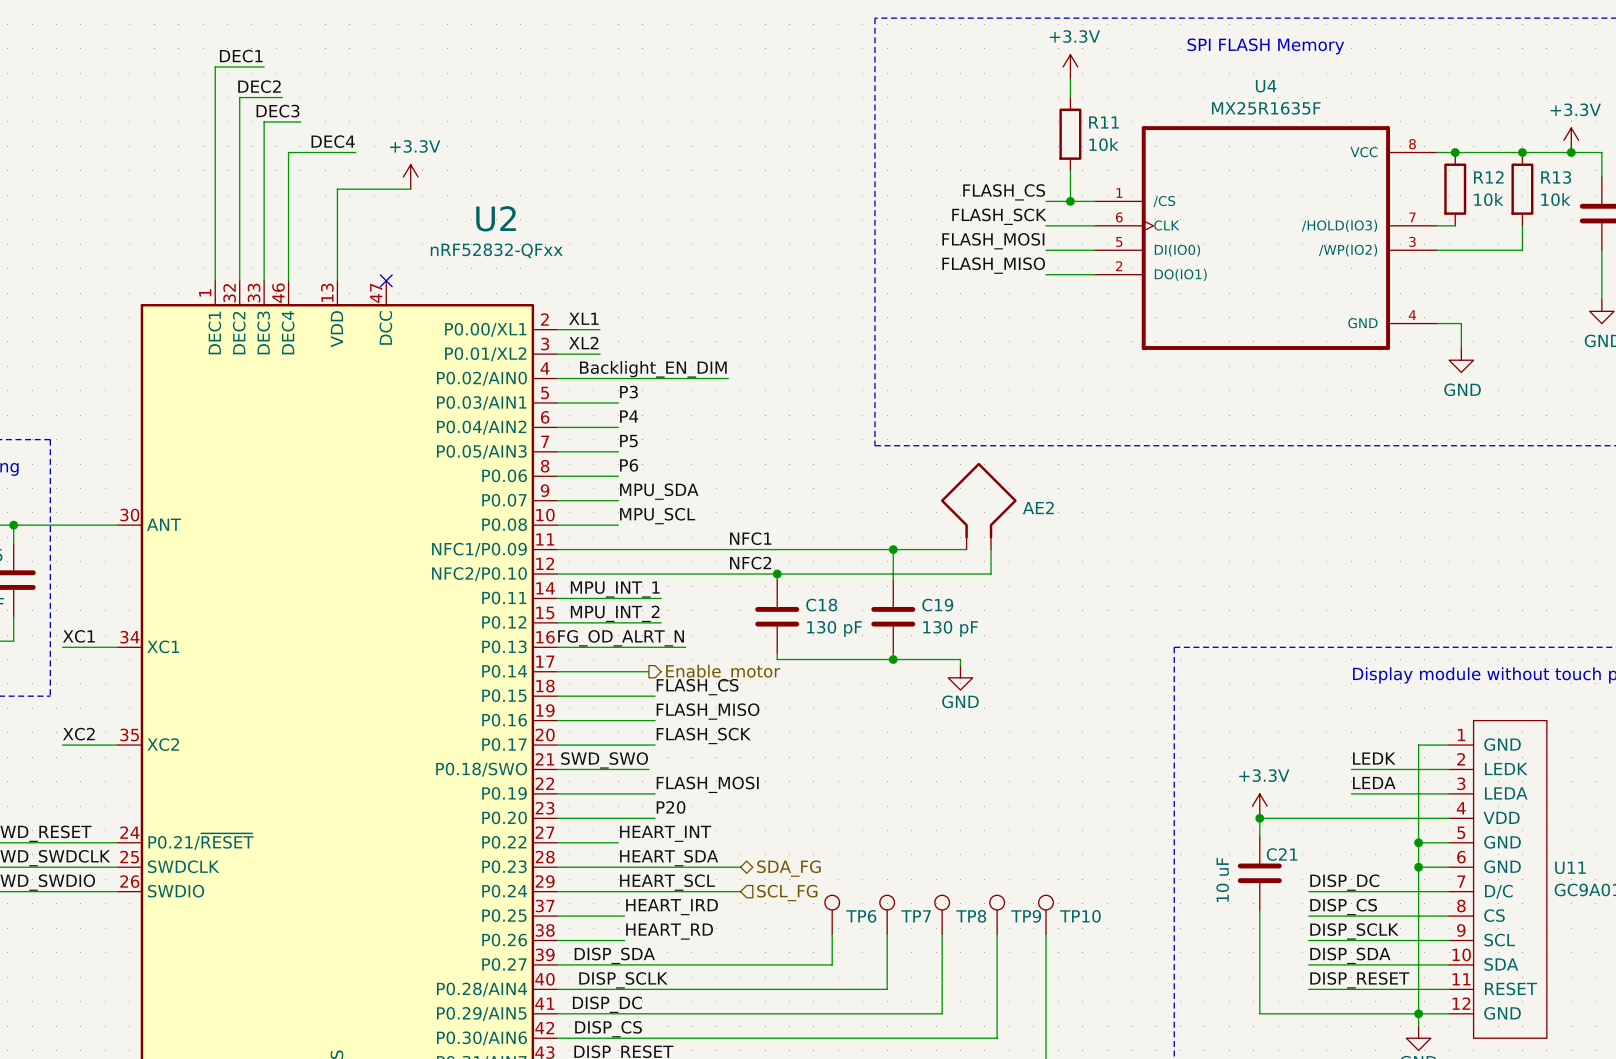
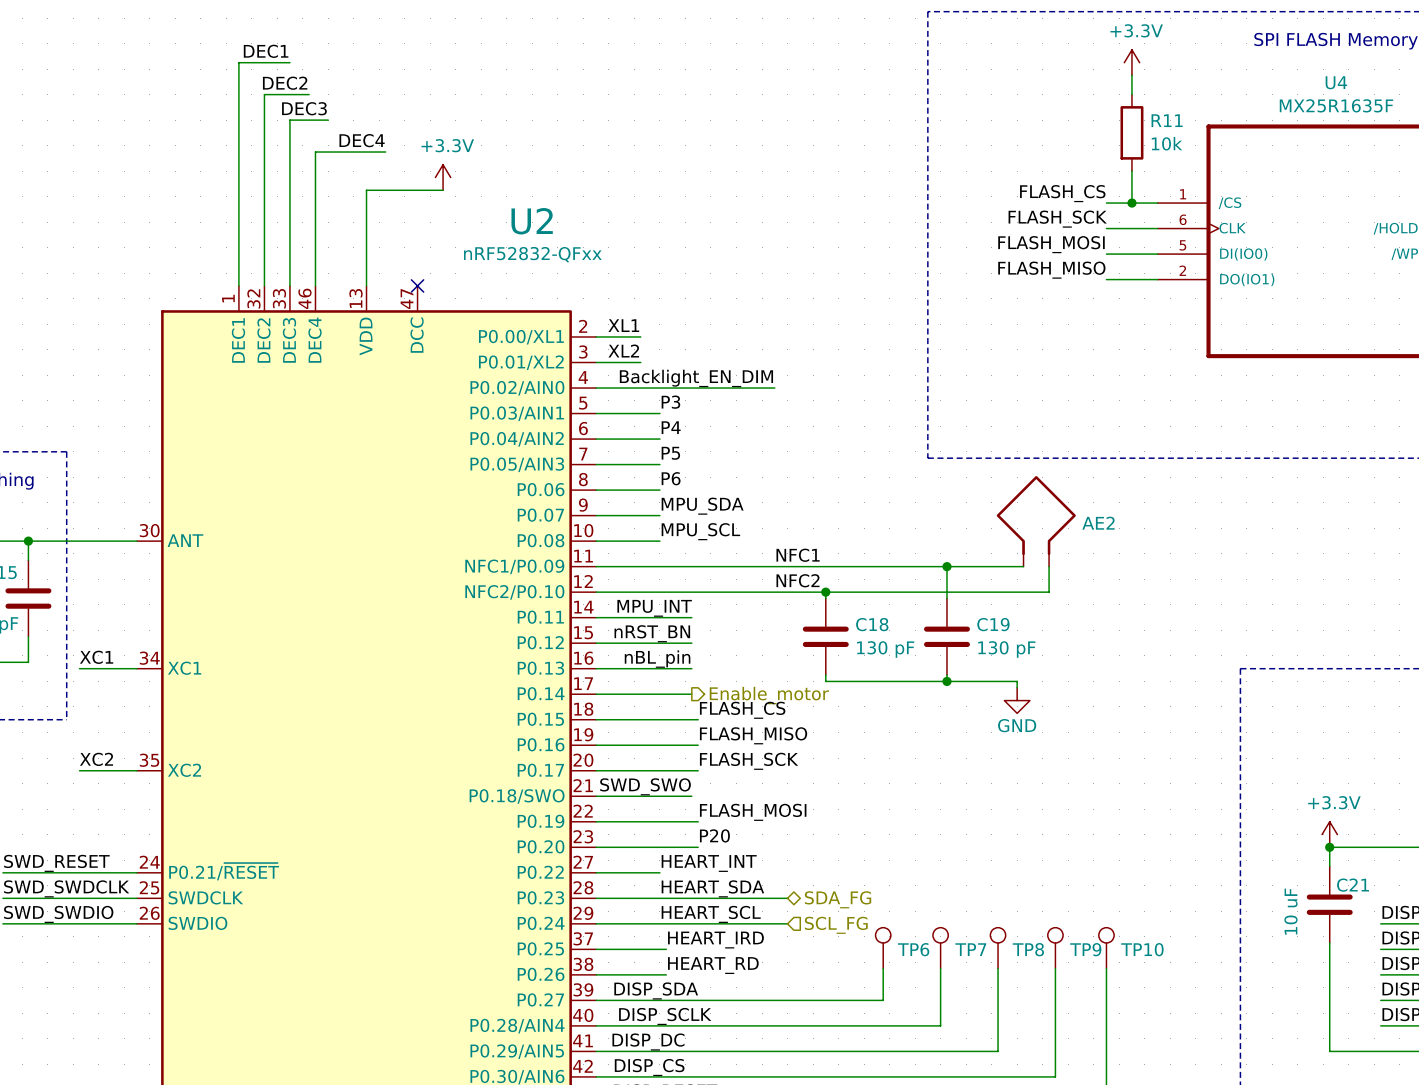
label: MPU_INT_1 (615, 589) -> MPU_INT (654, 608)
wire: (648, 598) (661, 598) -> none
label: none -> nRST_BN (652, 633)
label: MPU_INT_2 (615, 613) -> none
wire: (648, 622) (661, 622) -> none
label: none -> nBL_pin (657, 659)
label: FG_OD_ALRT_N (621, 638) -> none
wire: (648, 647) (685, 647) -> none

